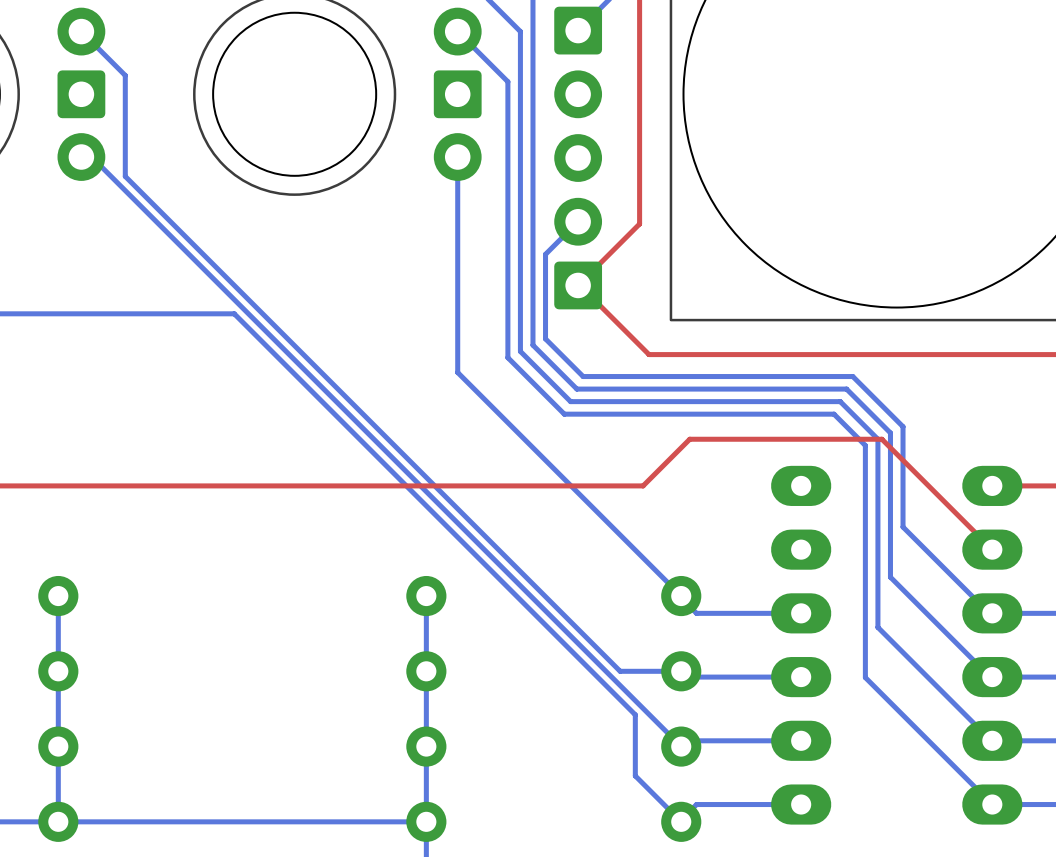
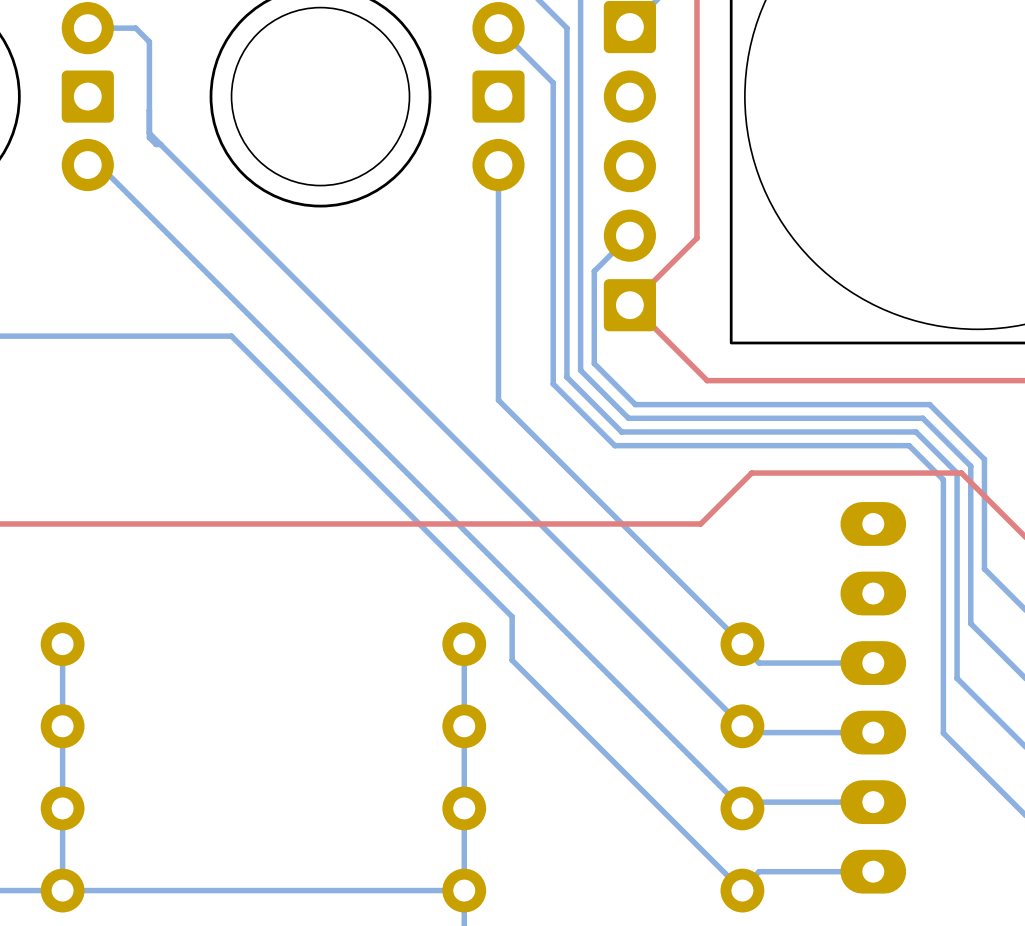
bottom track: (81, 31) (125, 75) (125, 176) (620, 671) (681, 671) -> (149, 133) (742, 726)
bottom track: none -> (87, 28) (135, 28) (149, 41) (149, 137) (156, 144) (160, 144)
bottom track: (213, 313) (234, 313) (635, 714) (635, 775) -> (231, 336) (512, 616) (512, 660) (692, 840)

